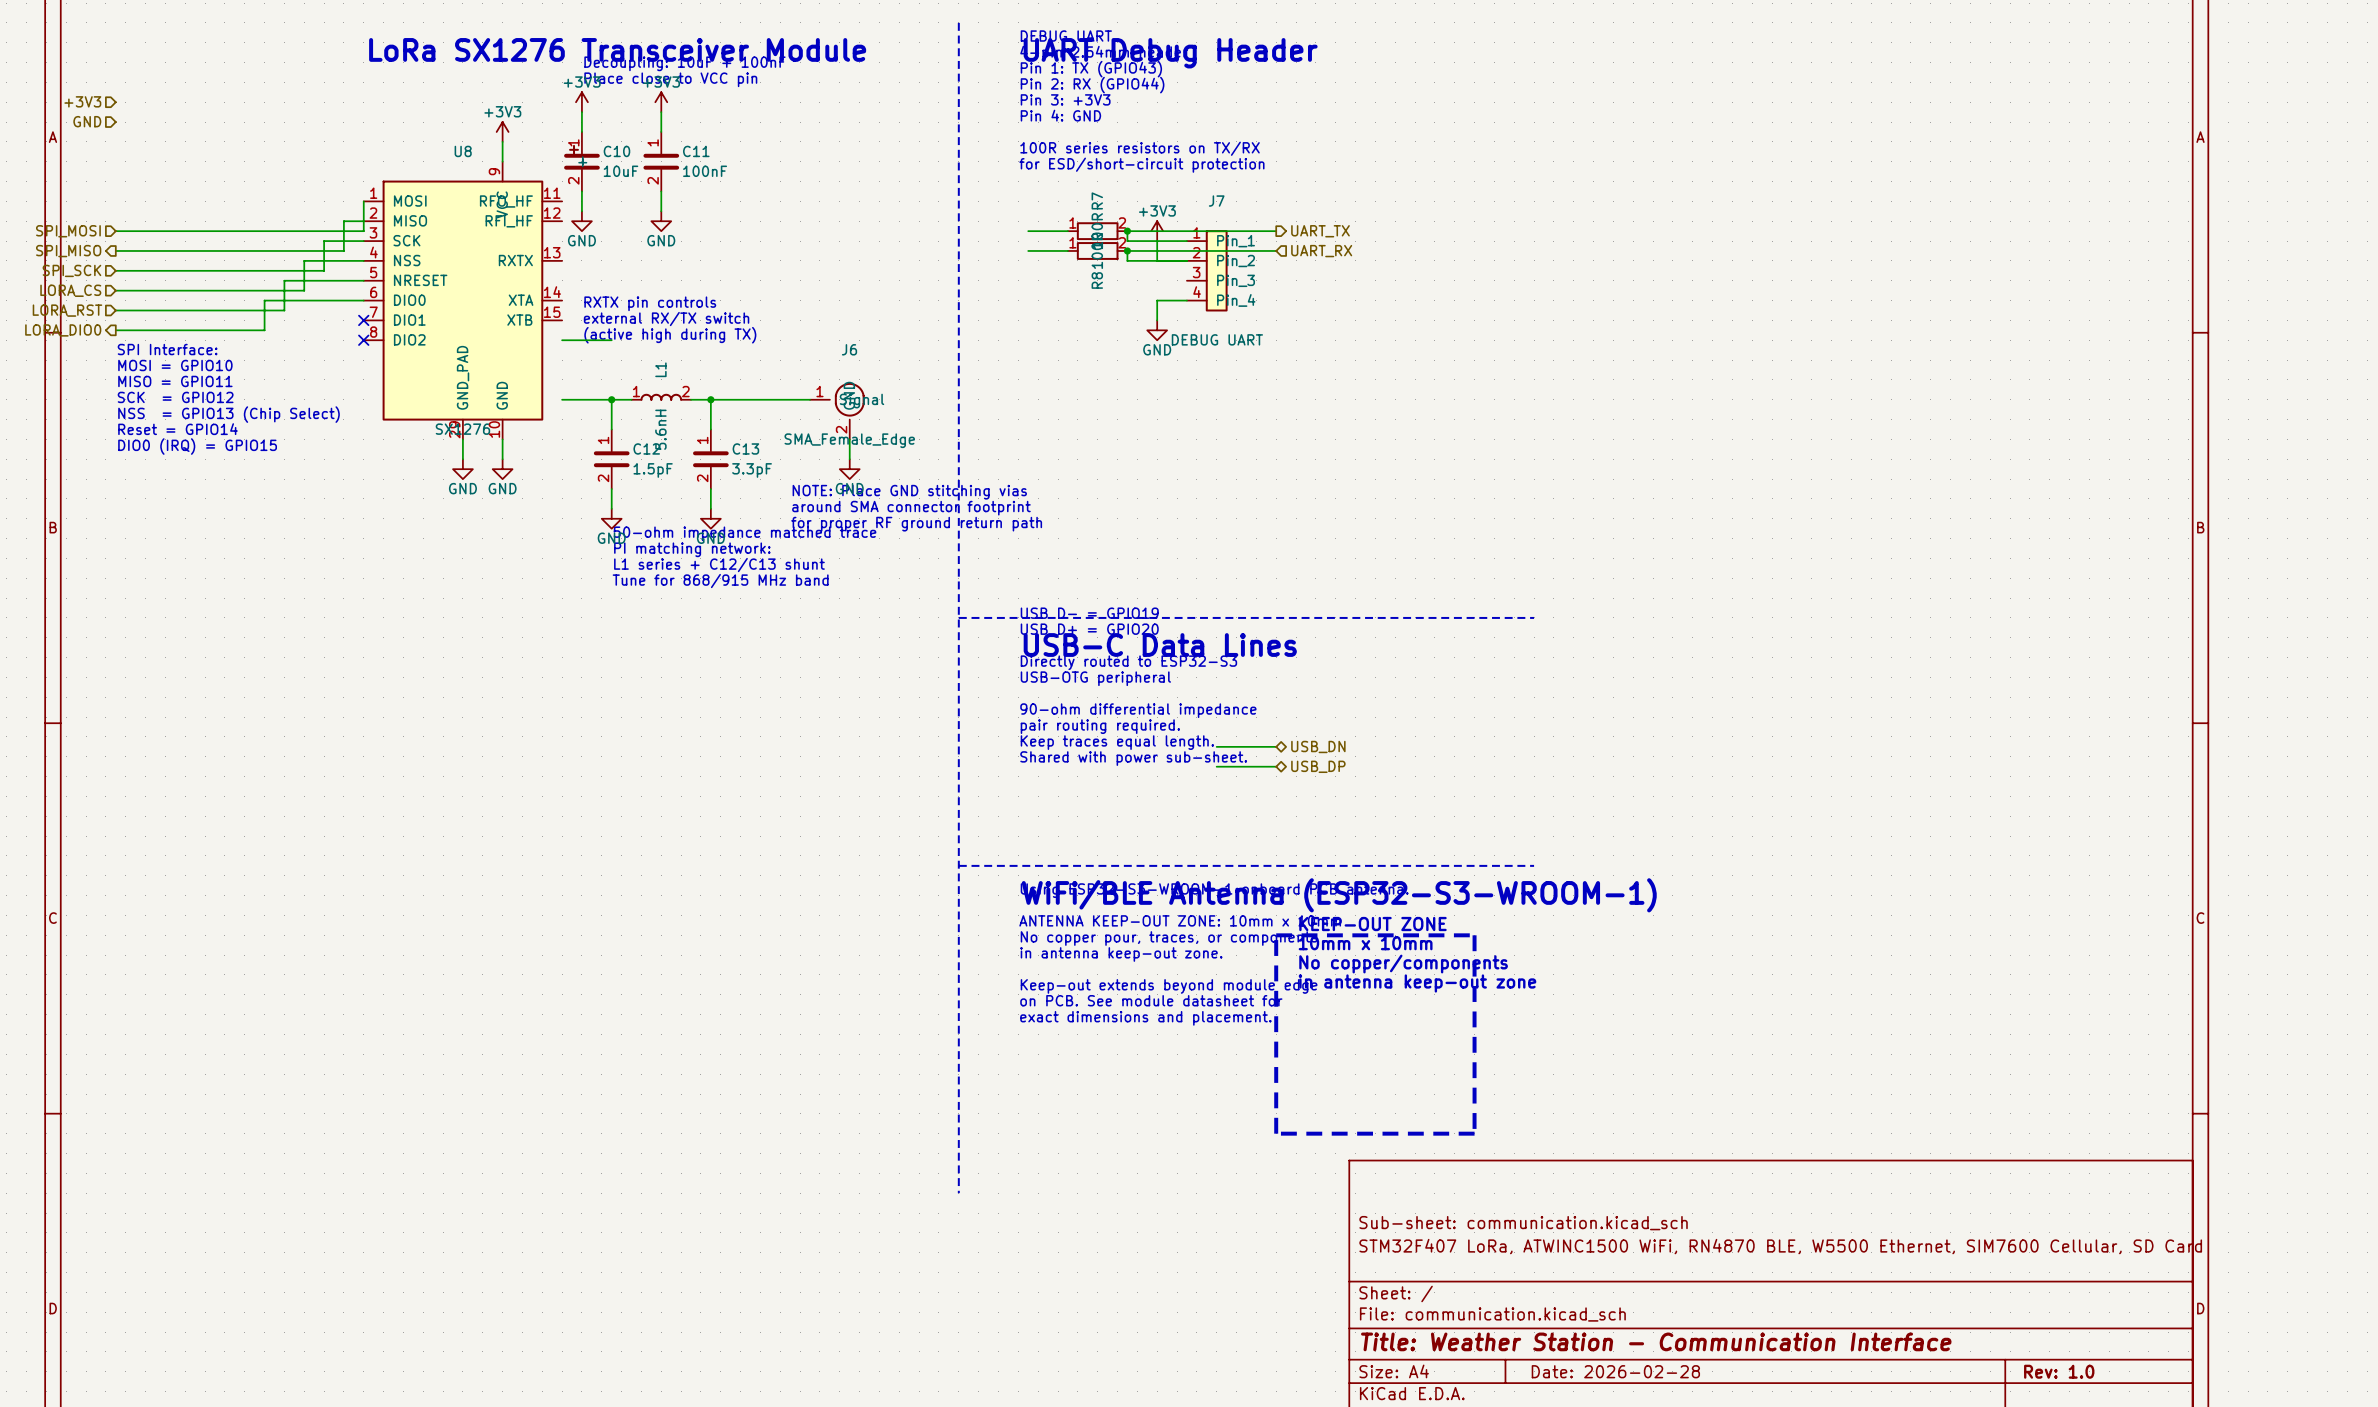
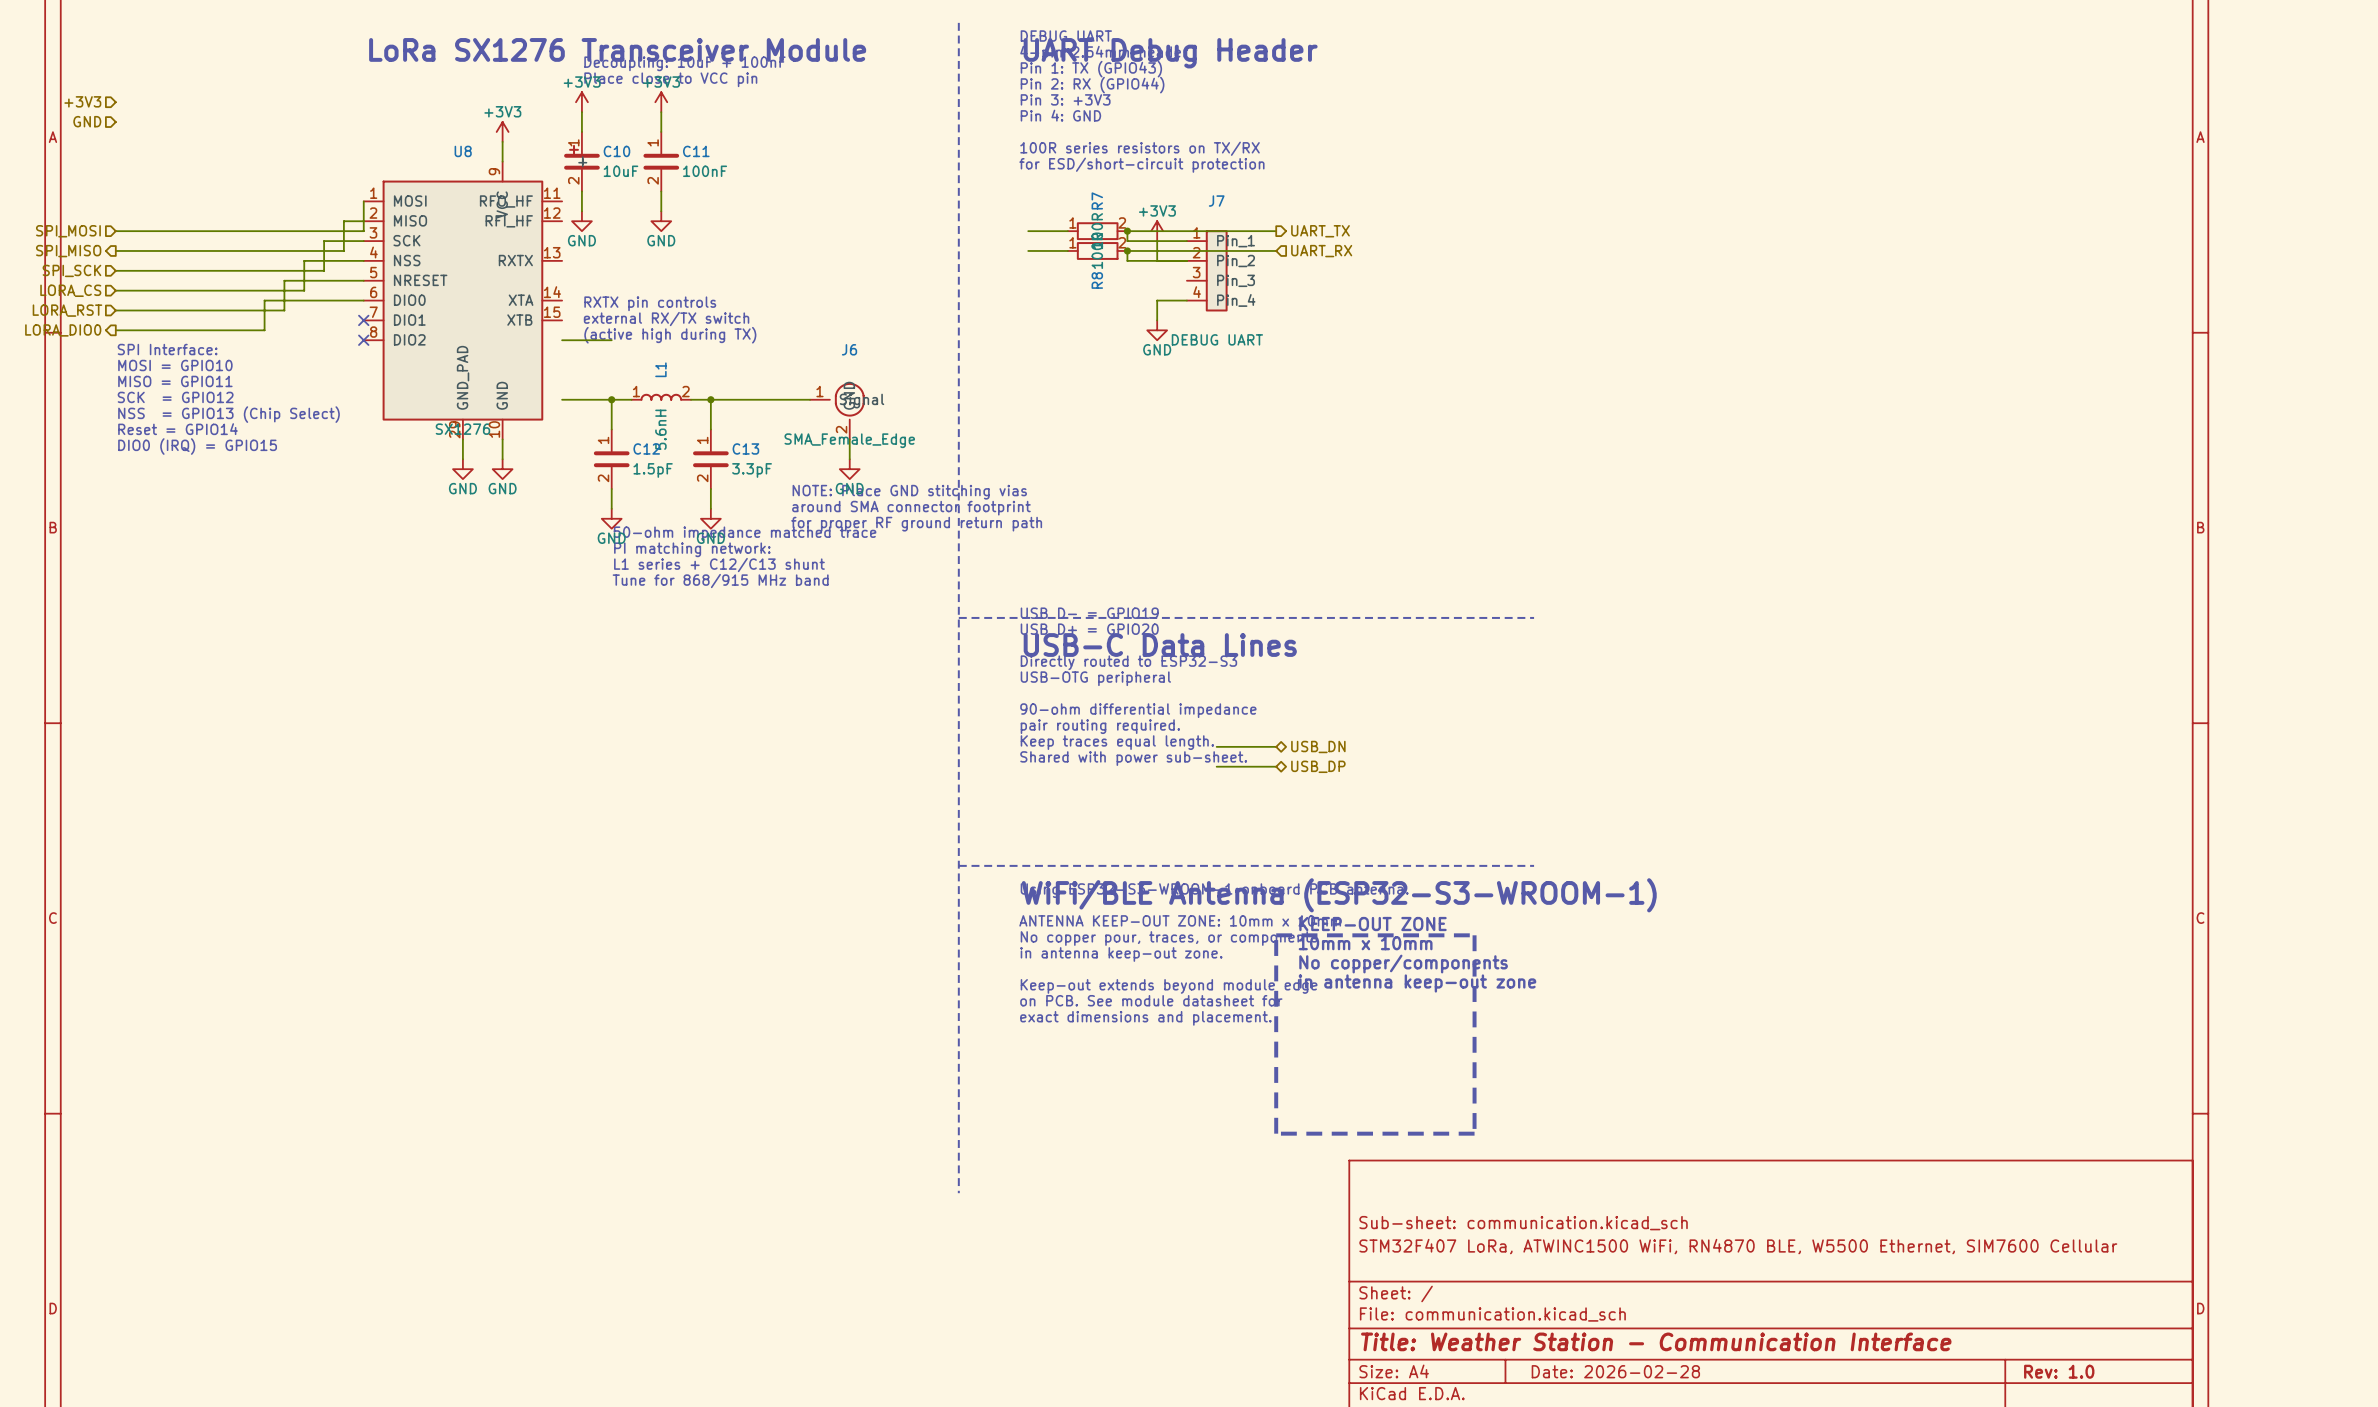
title block: STM32F407 LoRa, ATWINC1500 WiFi, RN4870 BLE, W5500 Ethernet, SIM7600 Cellular, SD Card (1780, 1246) -> STM32F407 LoRa, ATWINC1500 WiFi, RN4870 BLE, W5500 Ethernet, SIM7600 Cellular (1738, 1246)

